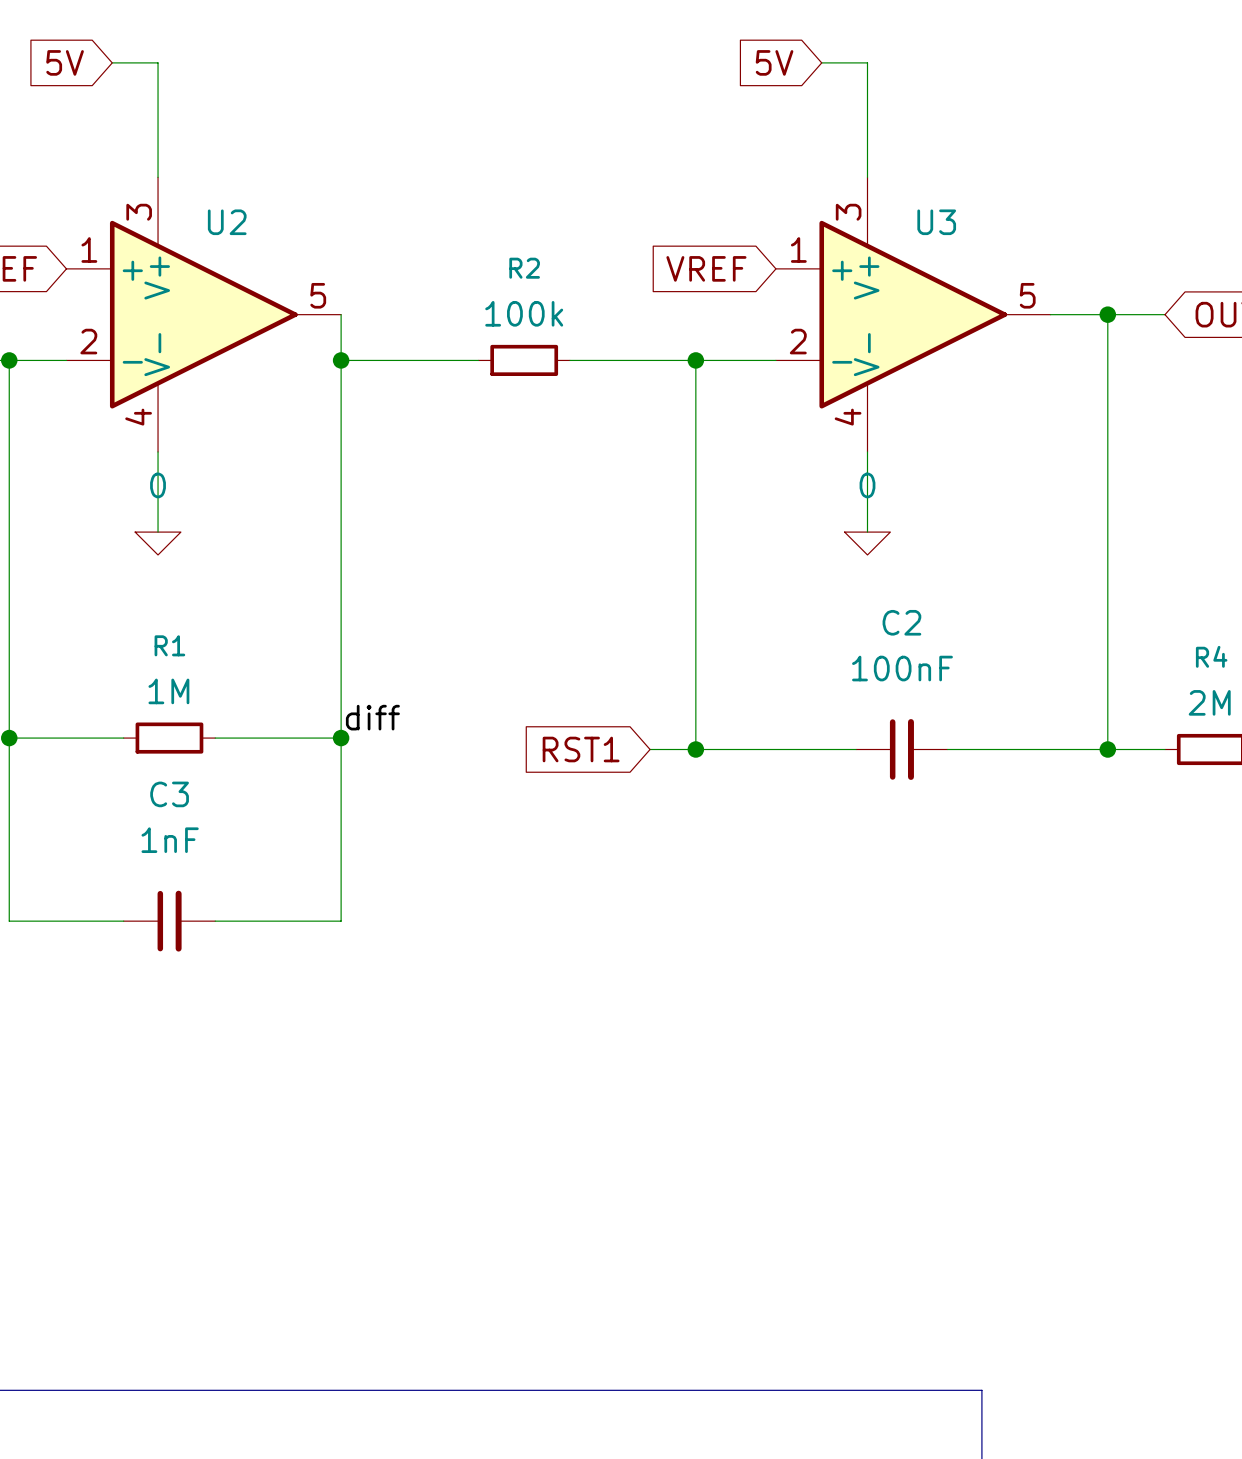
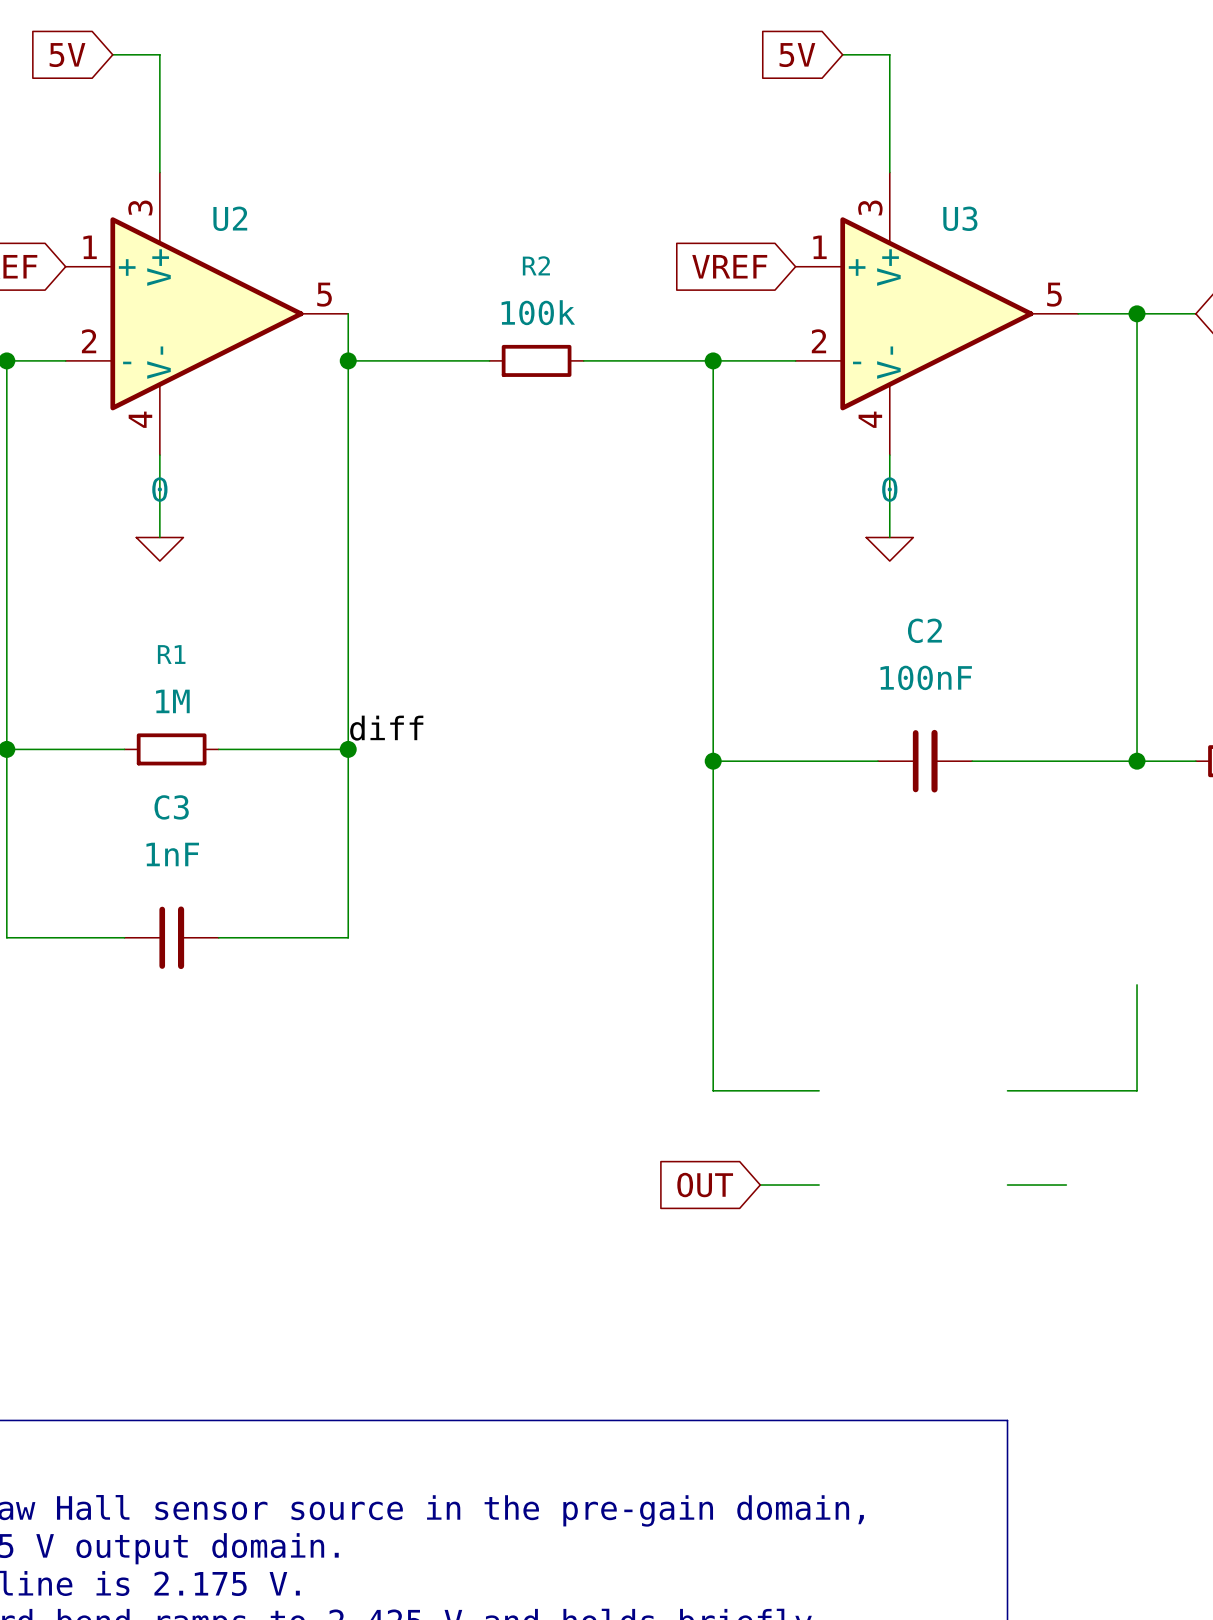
global label: RST1 (581, 749) -> none
wire: (650, 749) (695, 749) -> (819, 1090) (713, 1090) (713, 761)
wire: none -> (1137, 984) (1137, 1090) (1007, 1090)
global label: none -> OUT (705, 1185)
wire: none -> (760, 1185) (819, 1185)
wire: none -> (1007, 1185) (1066, 1185)

